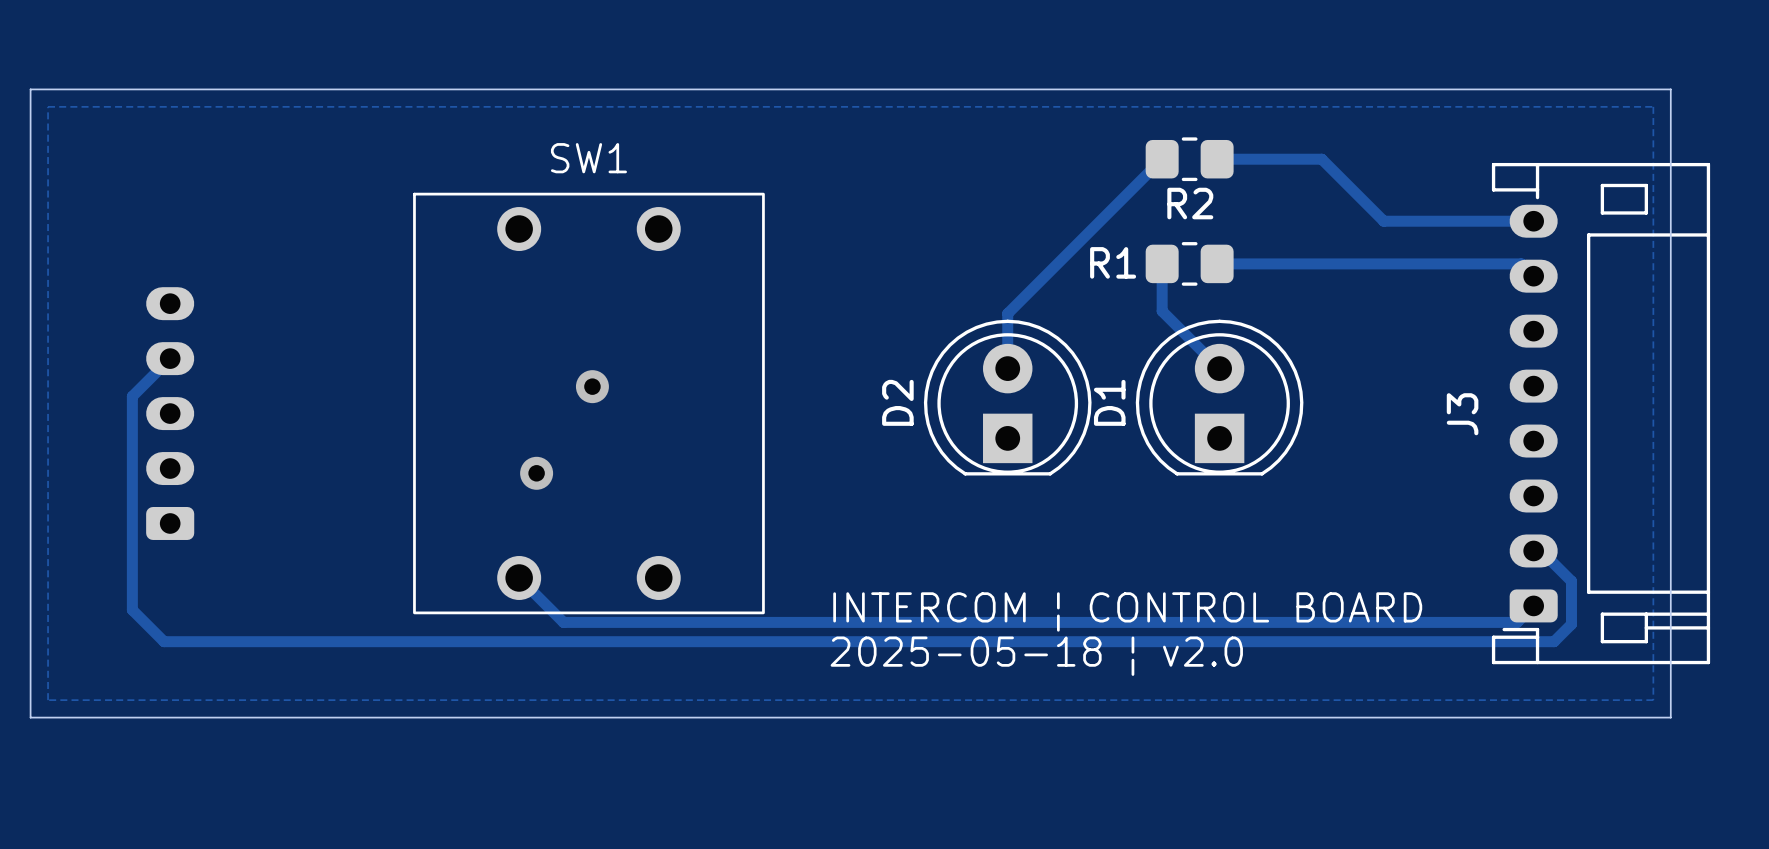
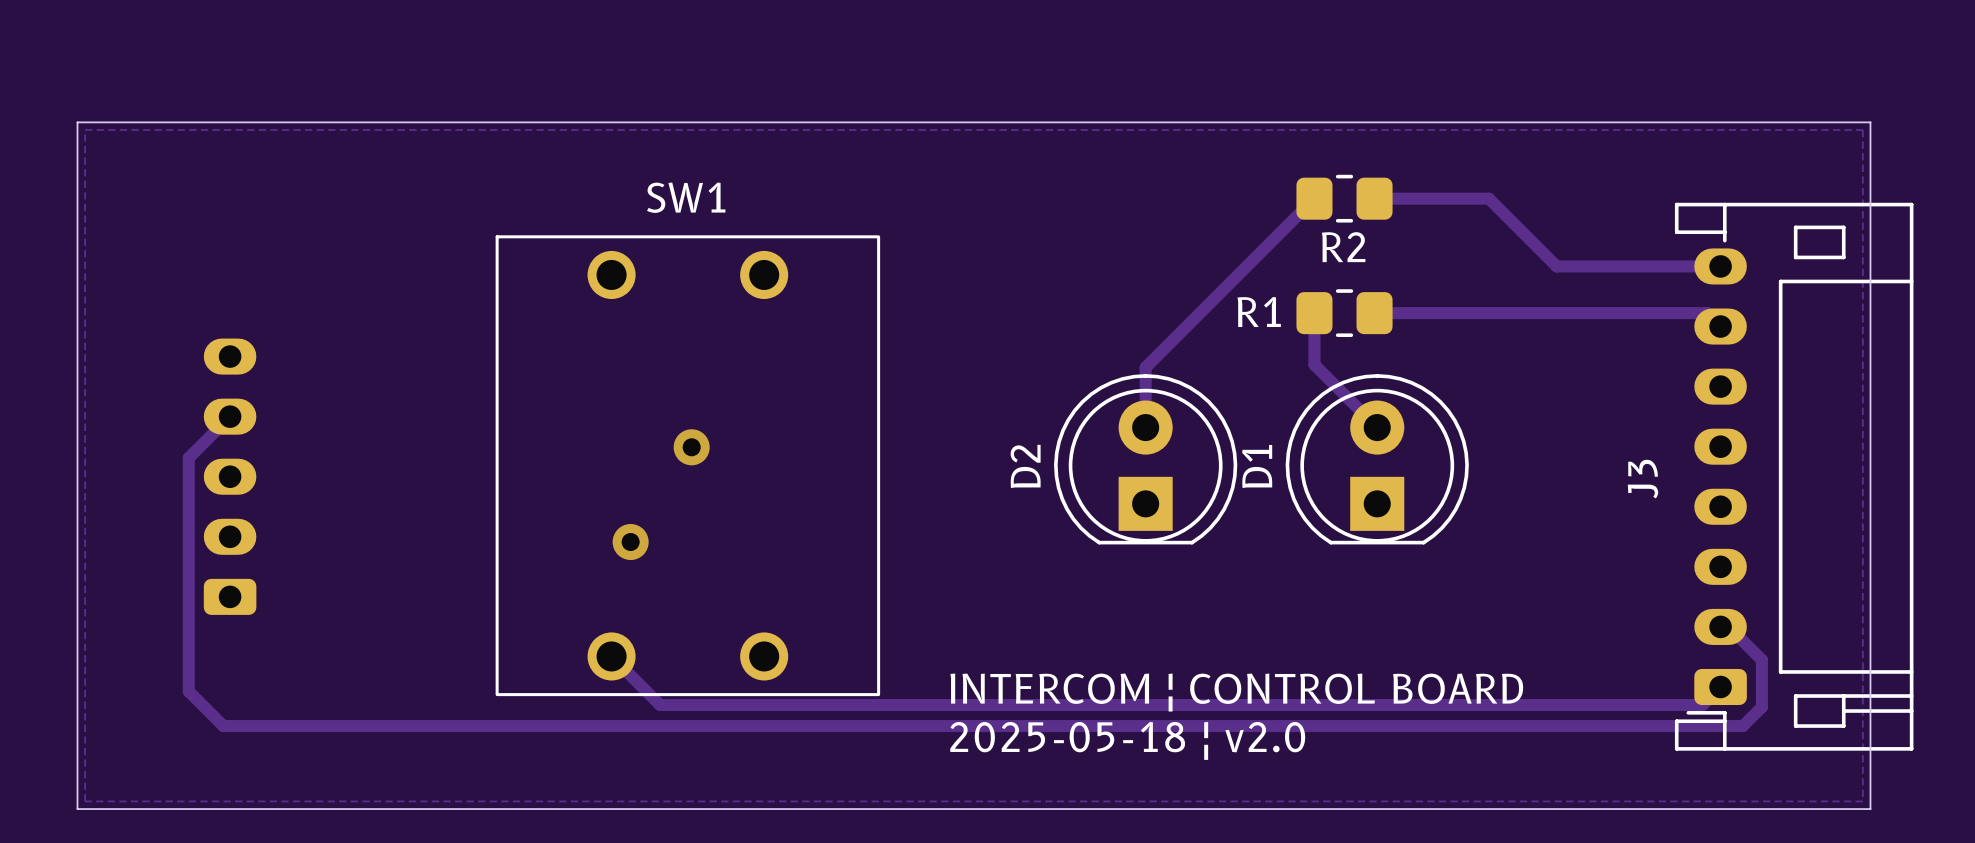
zone outline: (48, 106) (1653, 106) (1653, 700) (48, 700) (48, 106) -> (85, 130) (85, 801) (1862, 801) (1862, 130) (85, 130)

